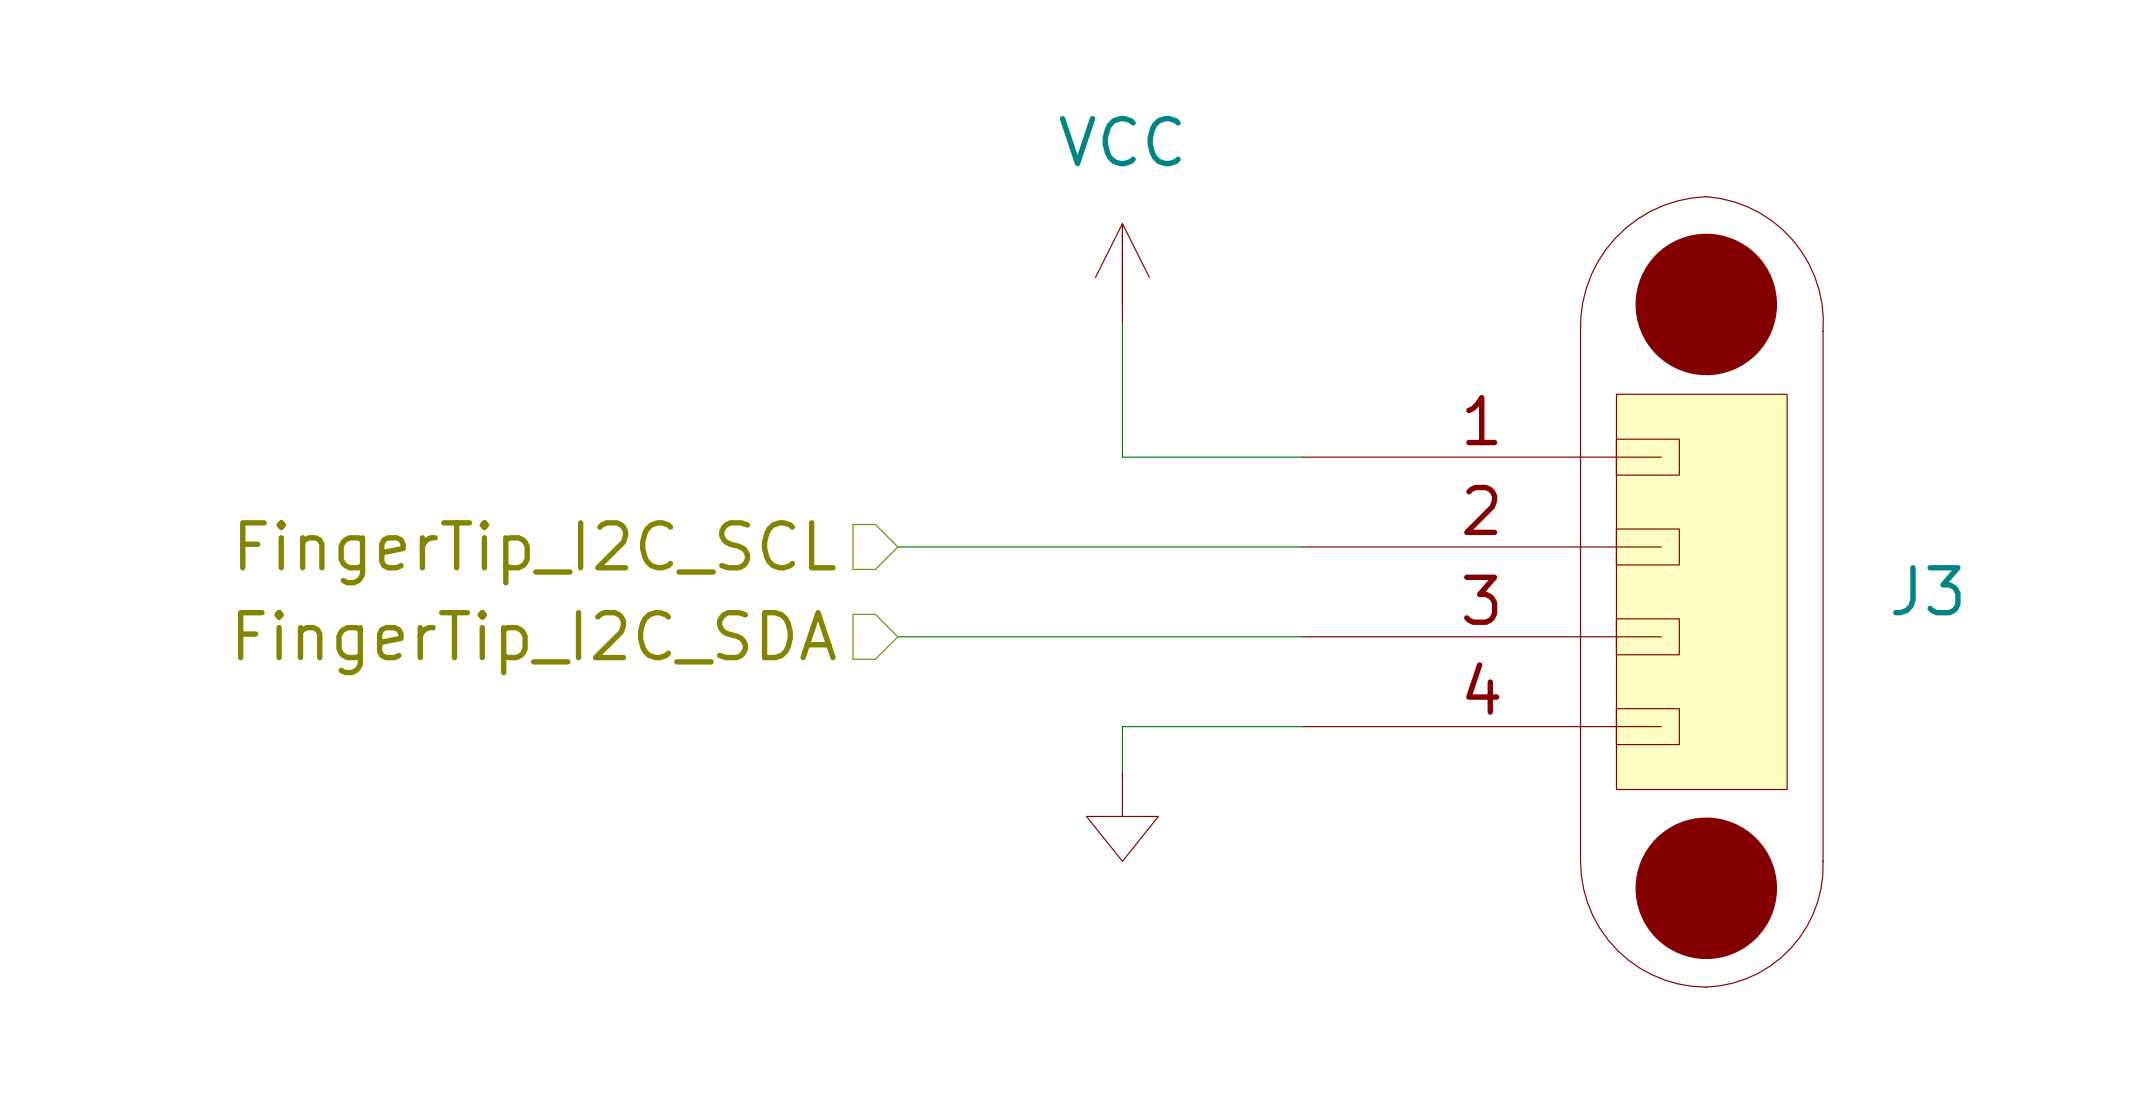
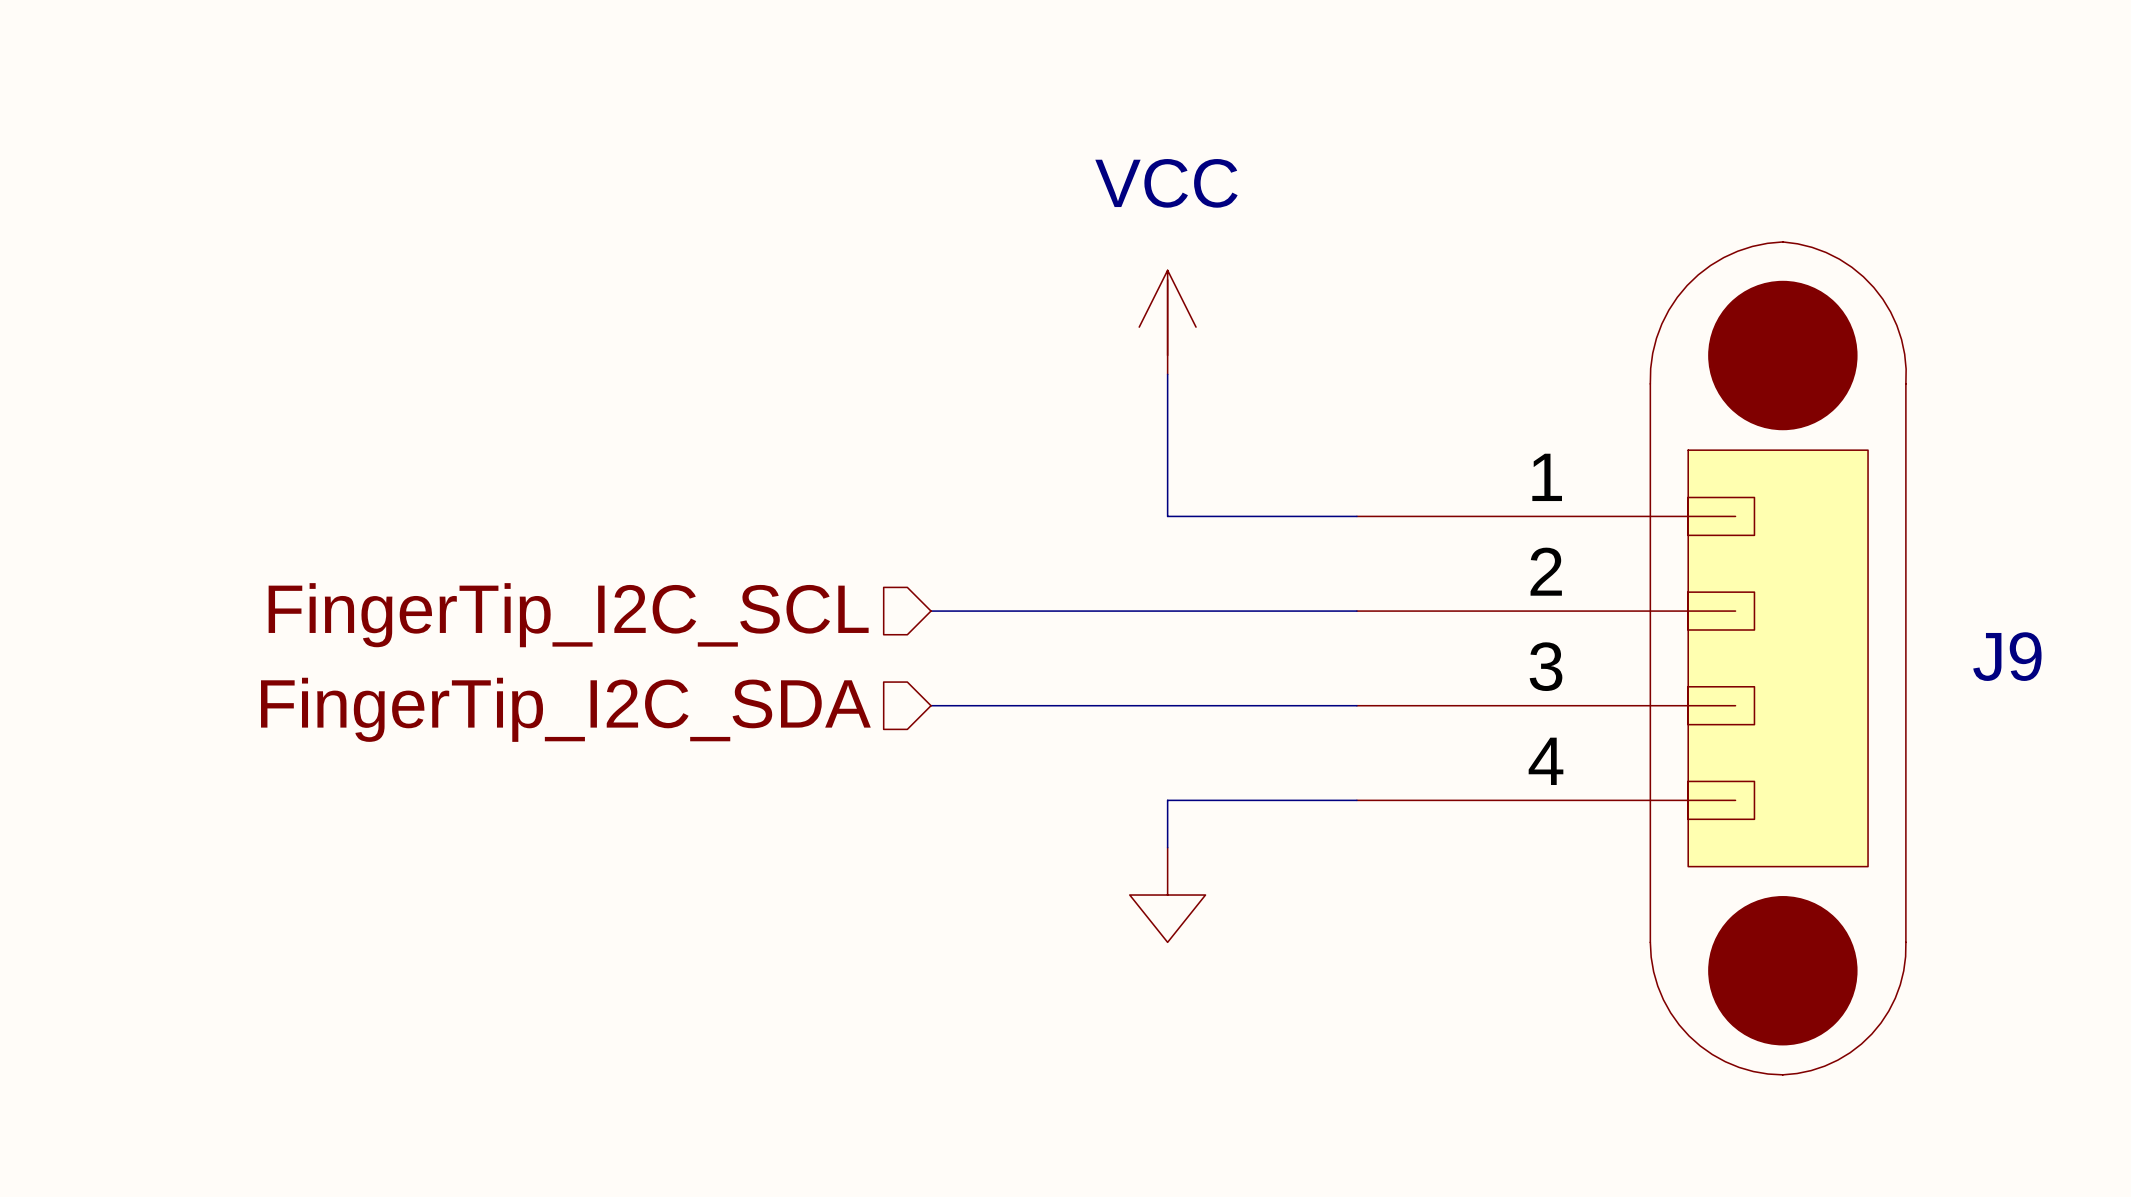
J3 name: J3 (1926, 590) -> J9 (2007, 656)

